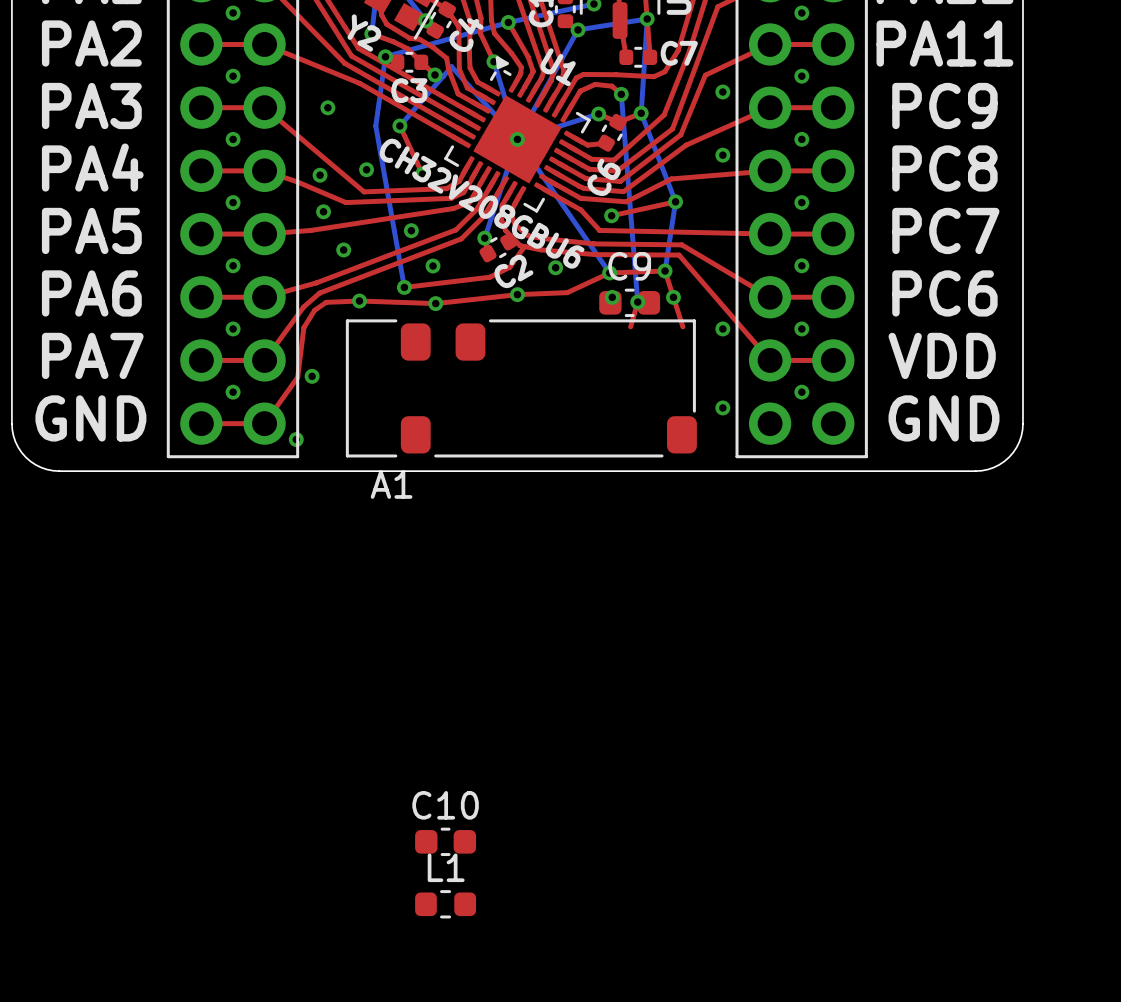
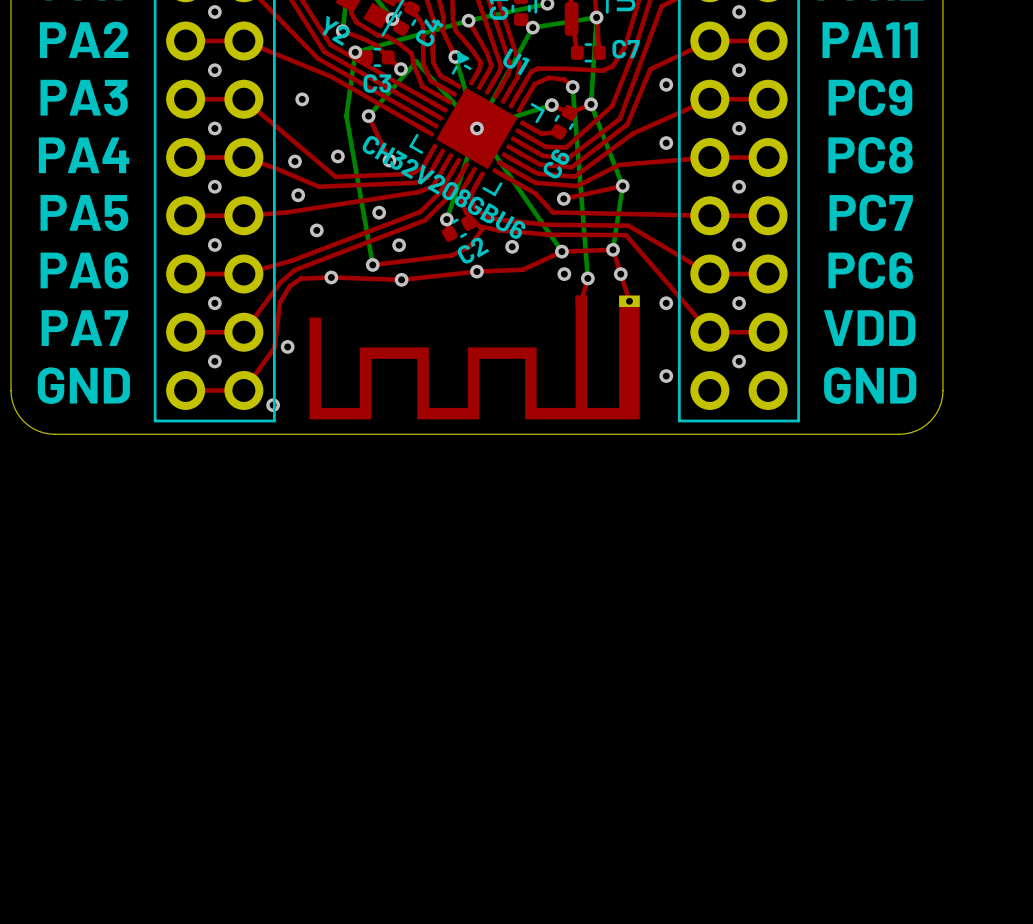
C9: (629, 302) -> none
part: none -> (474, 357)
A1: (521, 388) -> none
C10: (445, 841) -> none
L1: (445, 904) -> none

